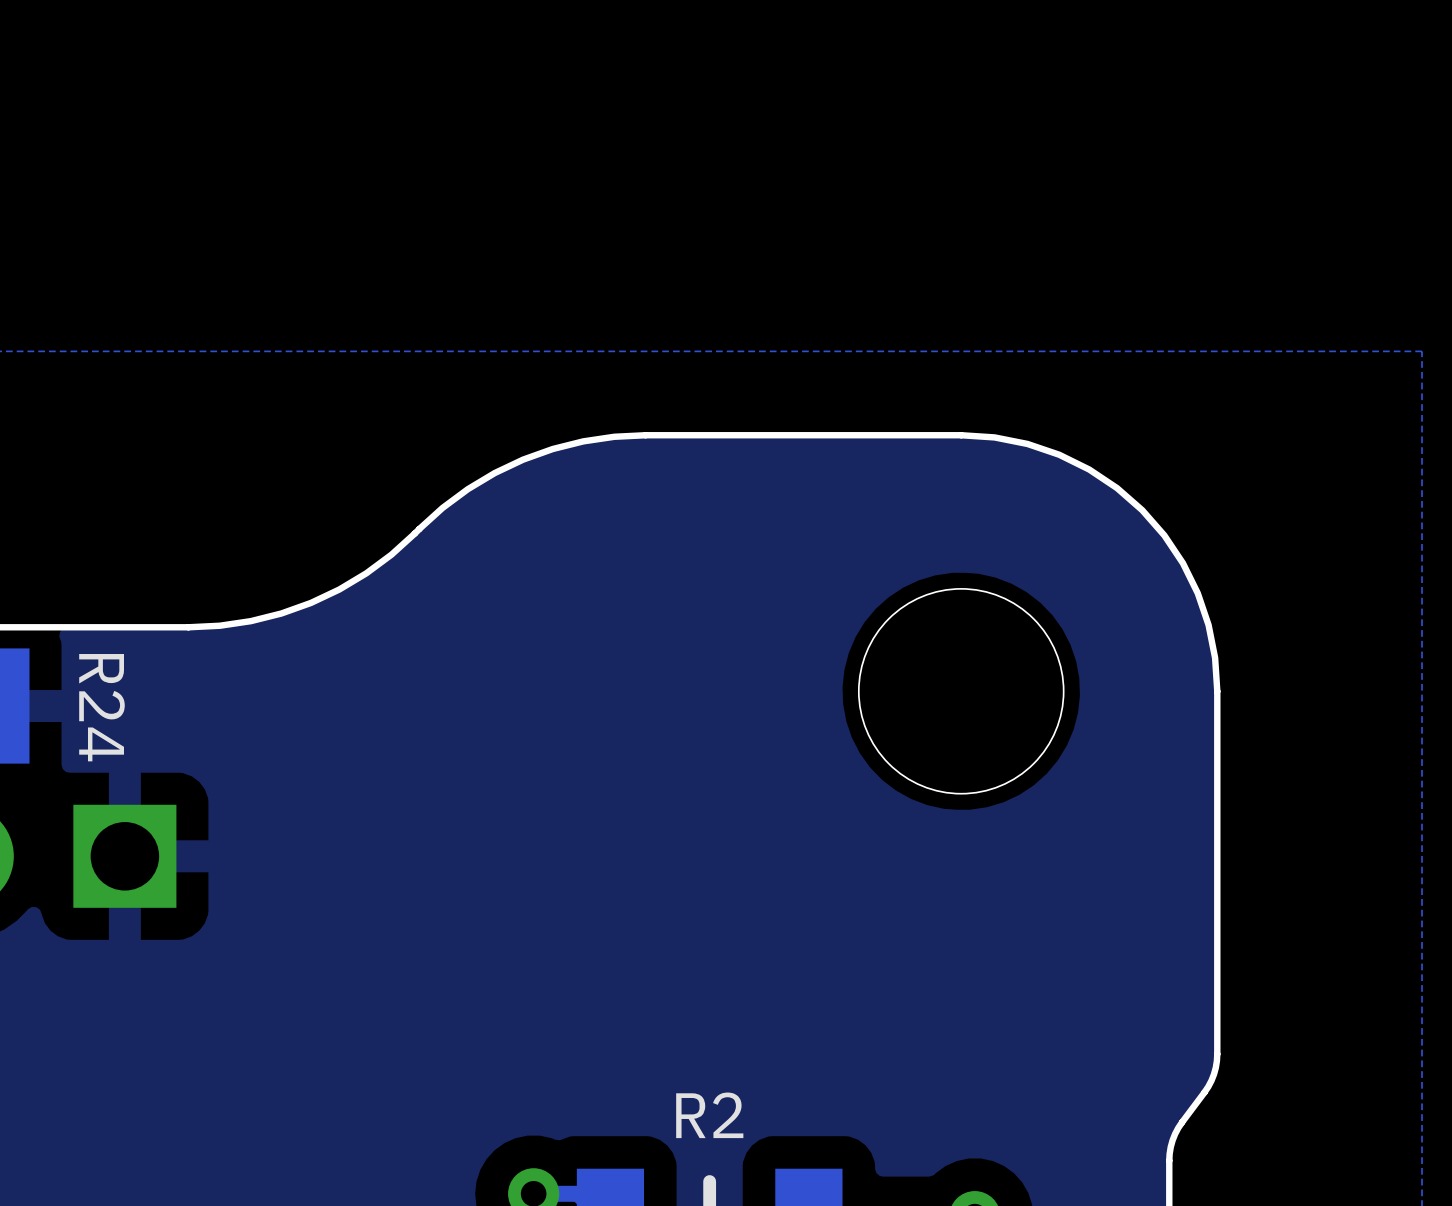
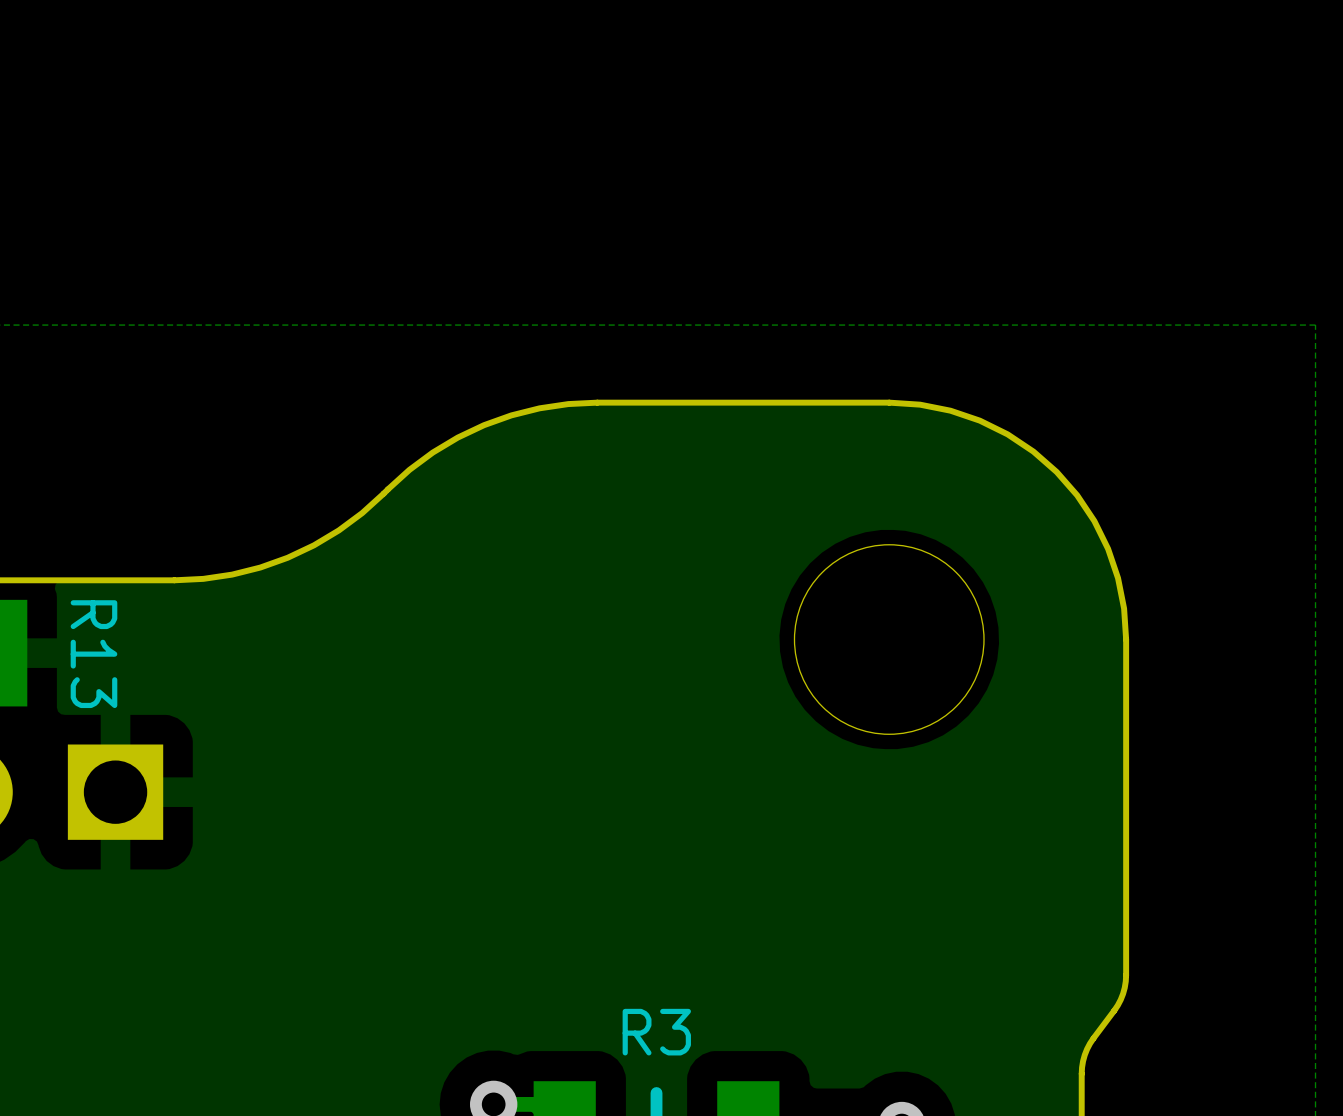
R24 name: R24 (101, 707) -> R13 (93, 654)
R2 name: R2 (709, 1115) -> R3 (656, 1032)

